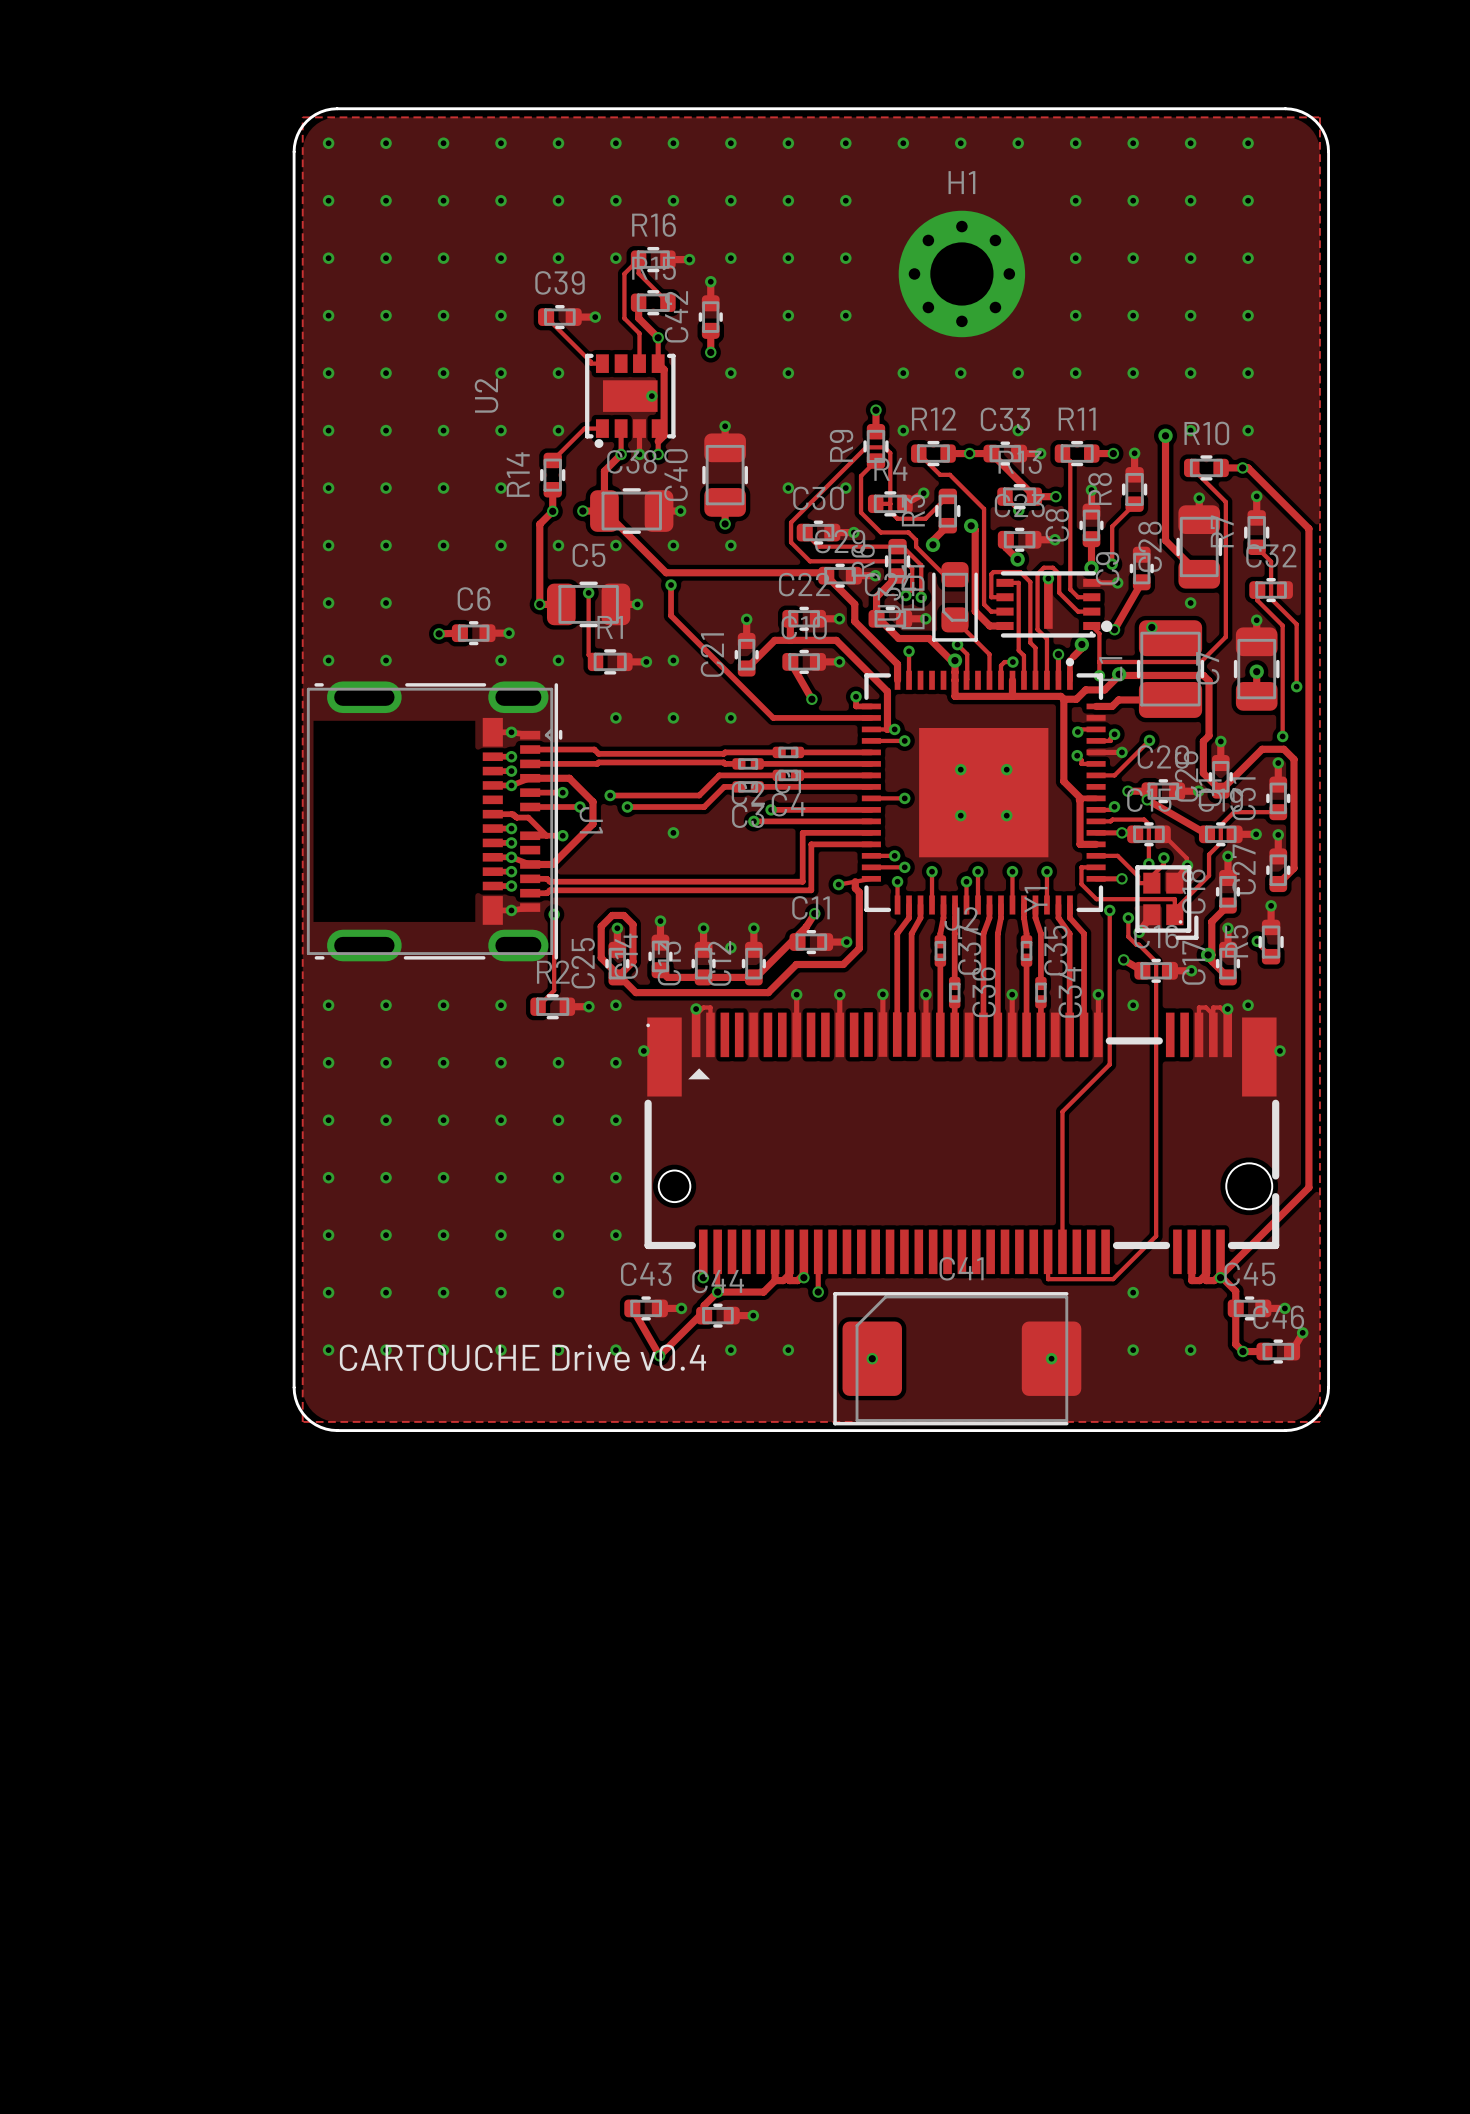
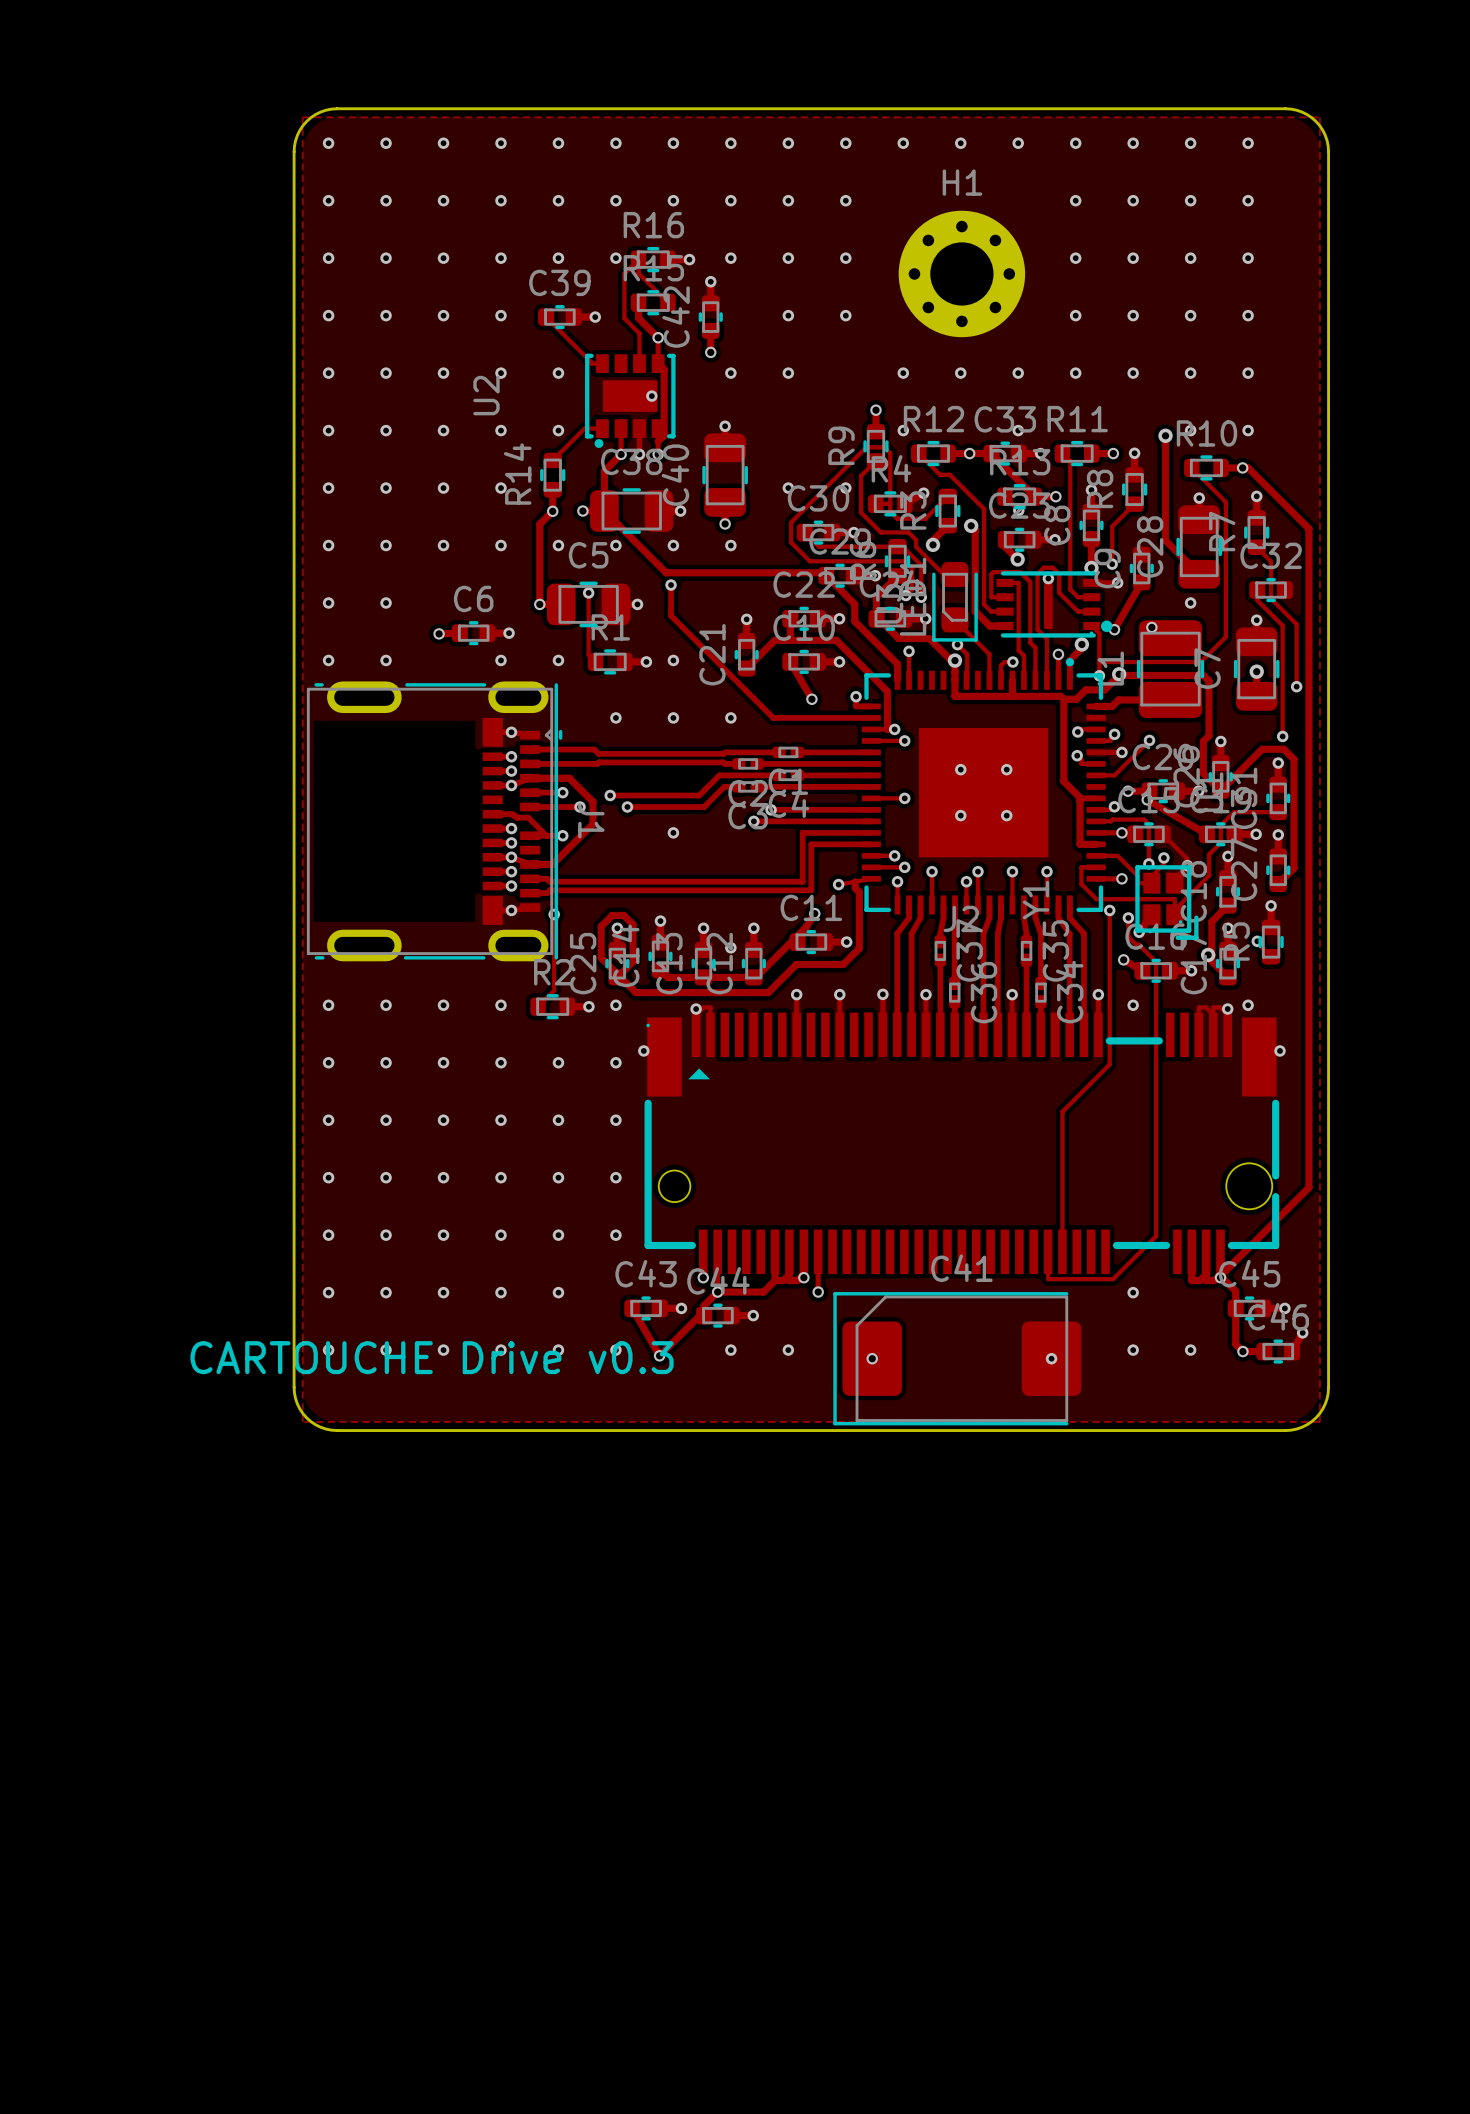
text: CARTOUCHE Drive v0.4 (522, 1357) -> CARTOUCHE Drive v0.3 (432, 1357)

